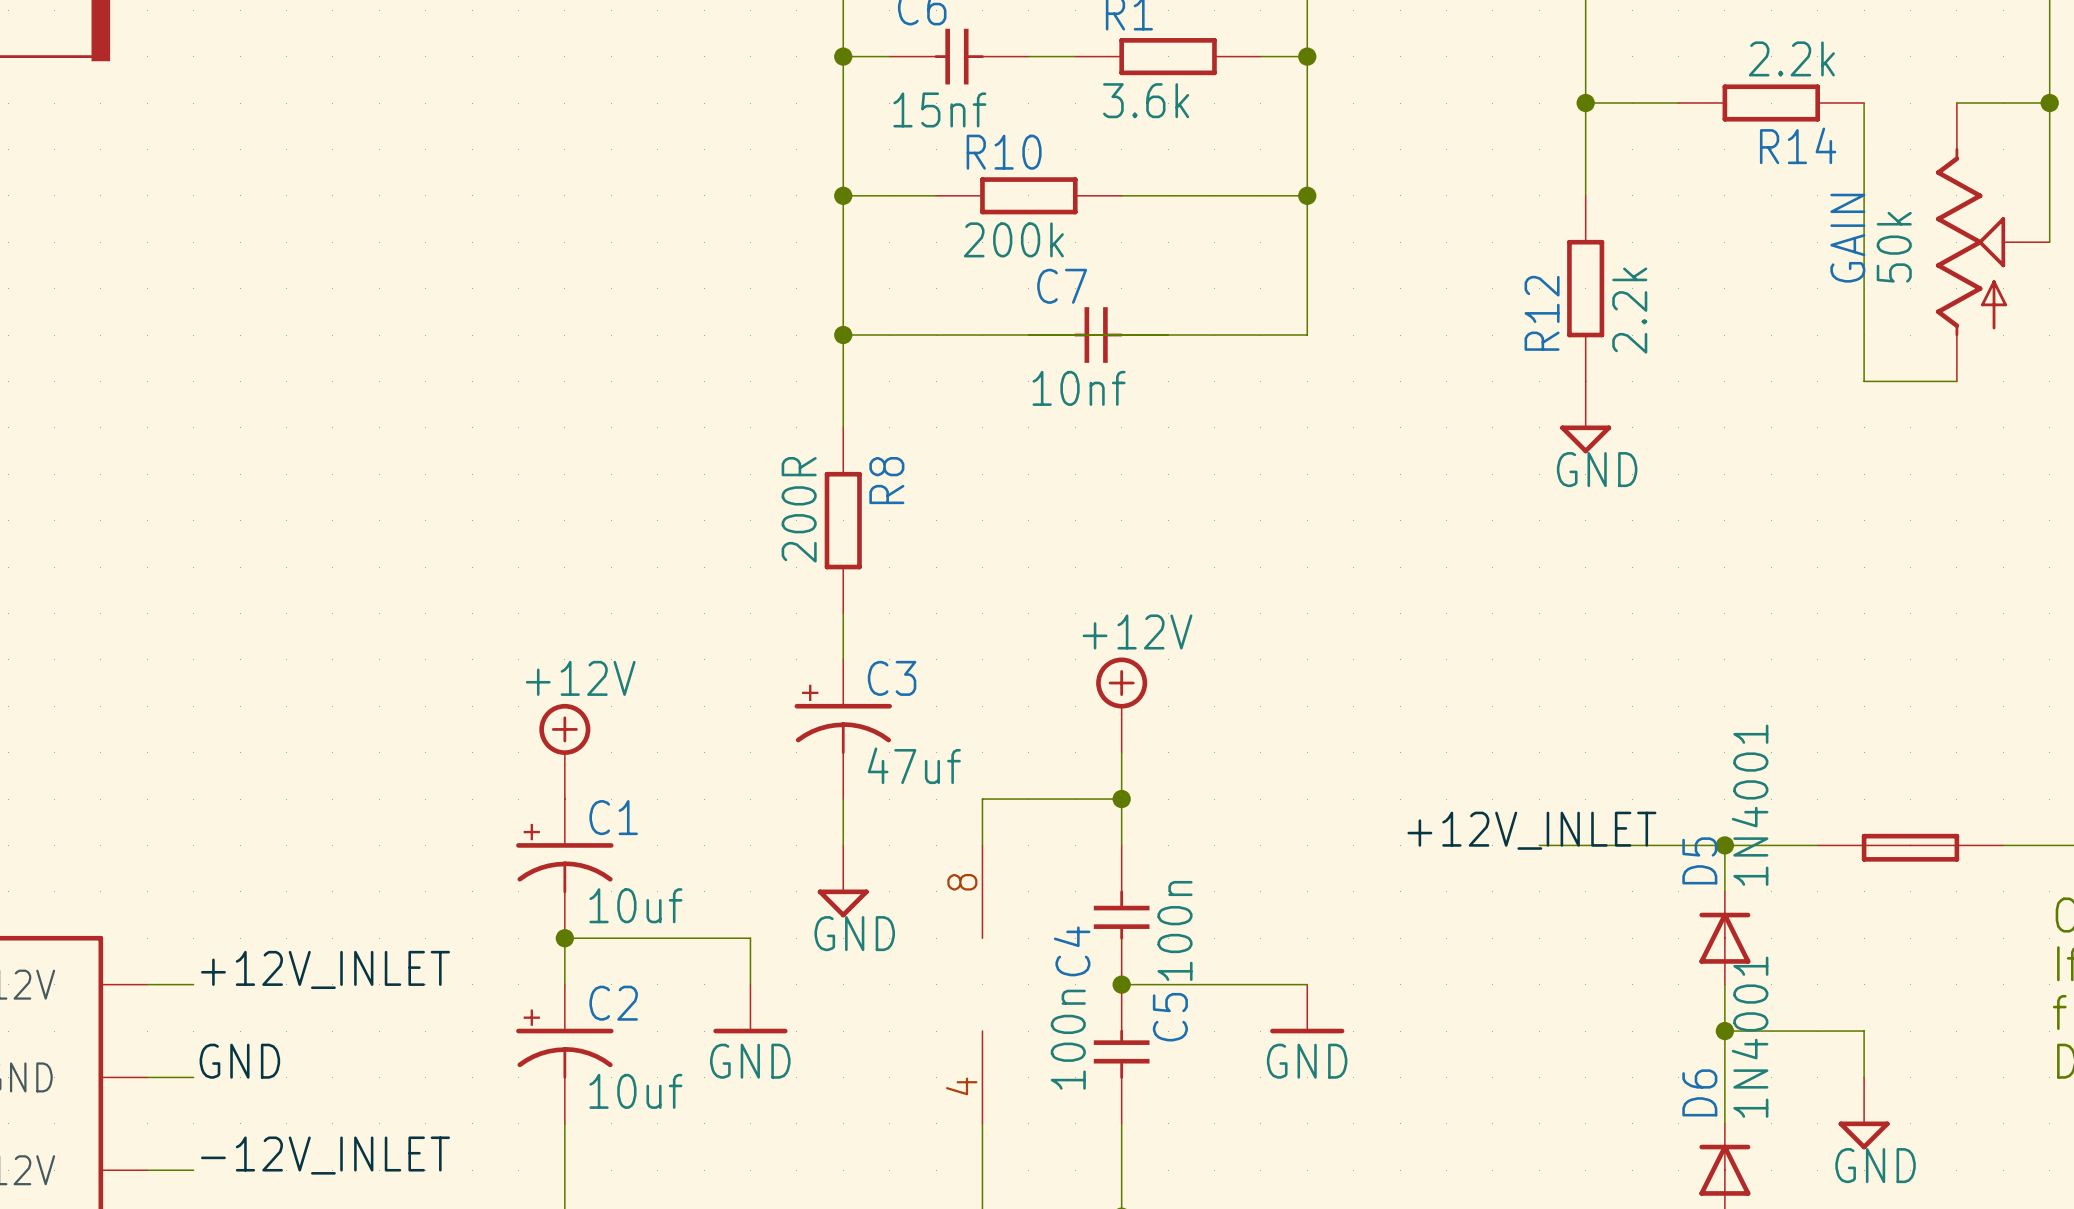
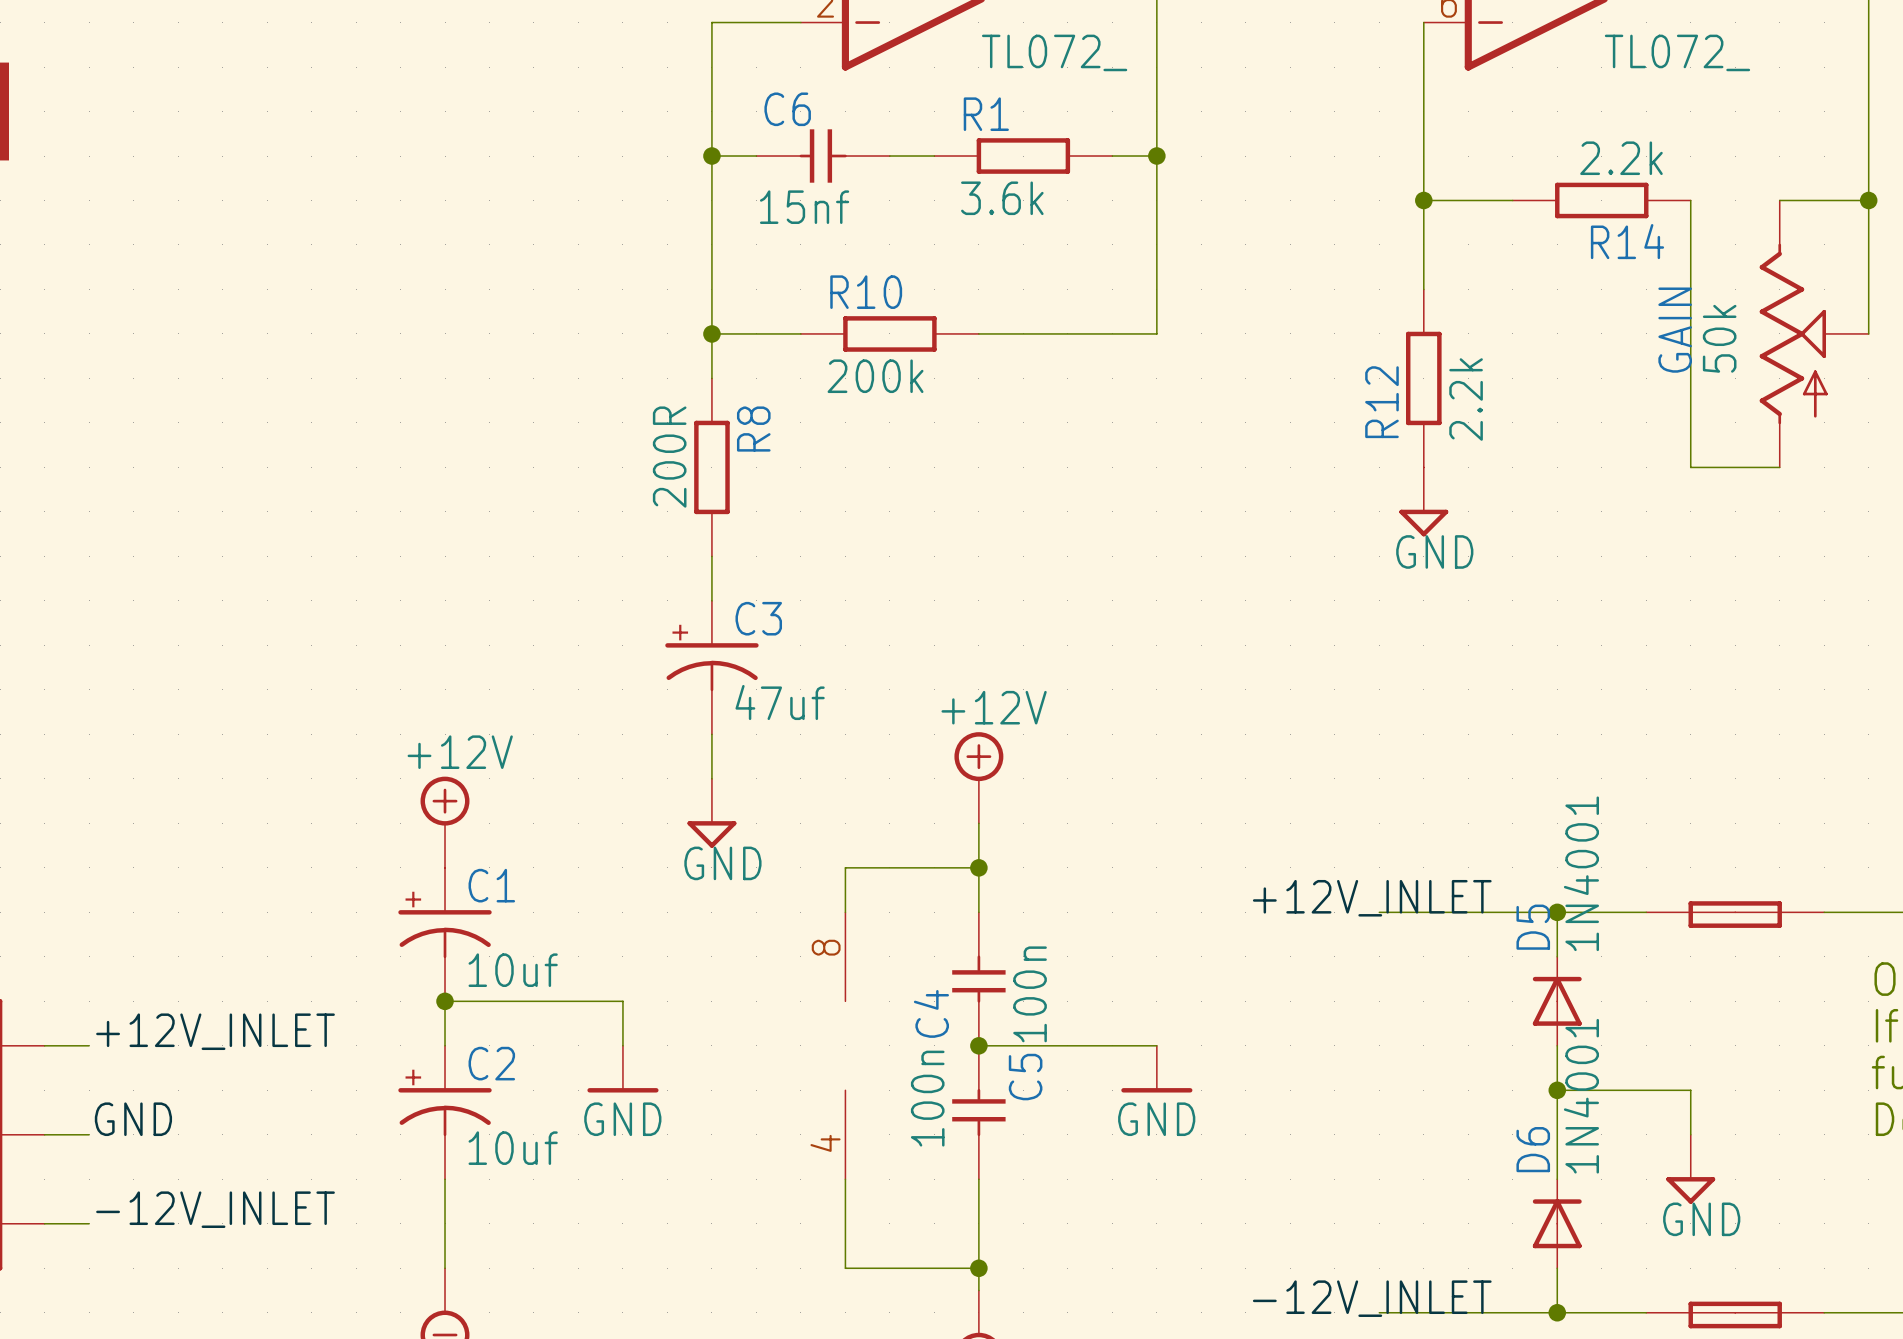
wire: (843, 195) (936, 195) -> (711, 333) (800, 333)
junction: (843, 195) -> none
R10 position: (1028, 195) -> (889, 333)
wire: (1121, 195) (1307, 195) -> none
junction: (1307, 195) -> none
junction: none -> (711, 333)
wire: (1307, 242) (1307, 335) (843, 335) -> (1156, 333) (978, 333)
wire: (843, 288) (843, 427) -> none
junction: (843, 335) -> none
C7: 10nf (1098, 335) -> none
R8 position: (843, 520) -> (711, 467)
C3 position: (843, 729) -> (711, 667)
wire: (843, 799) (843, 845) -> (711, 556) (711, 600)
power symbol position: GND (843, 881) -> GND (711, 813)

